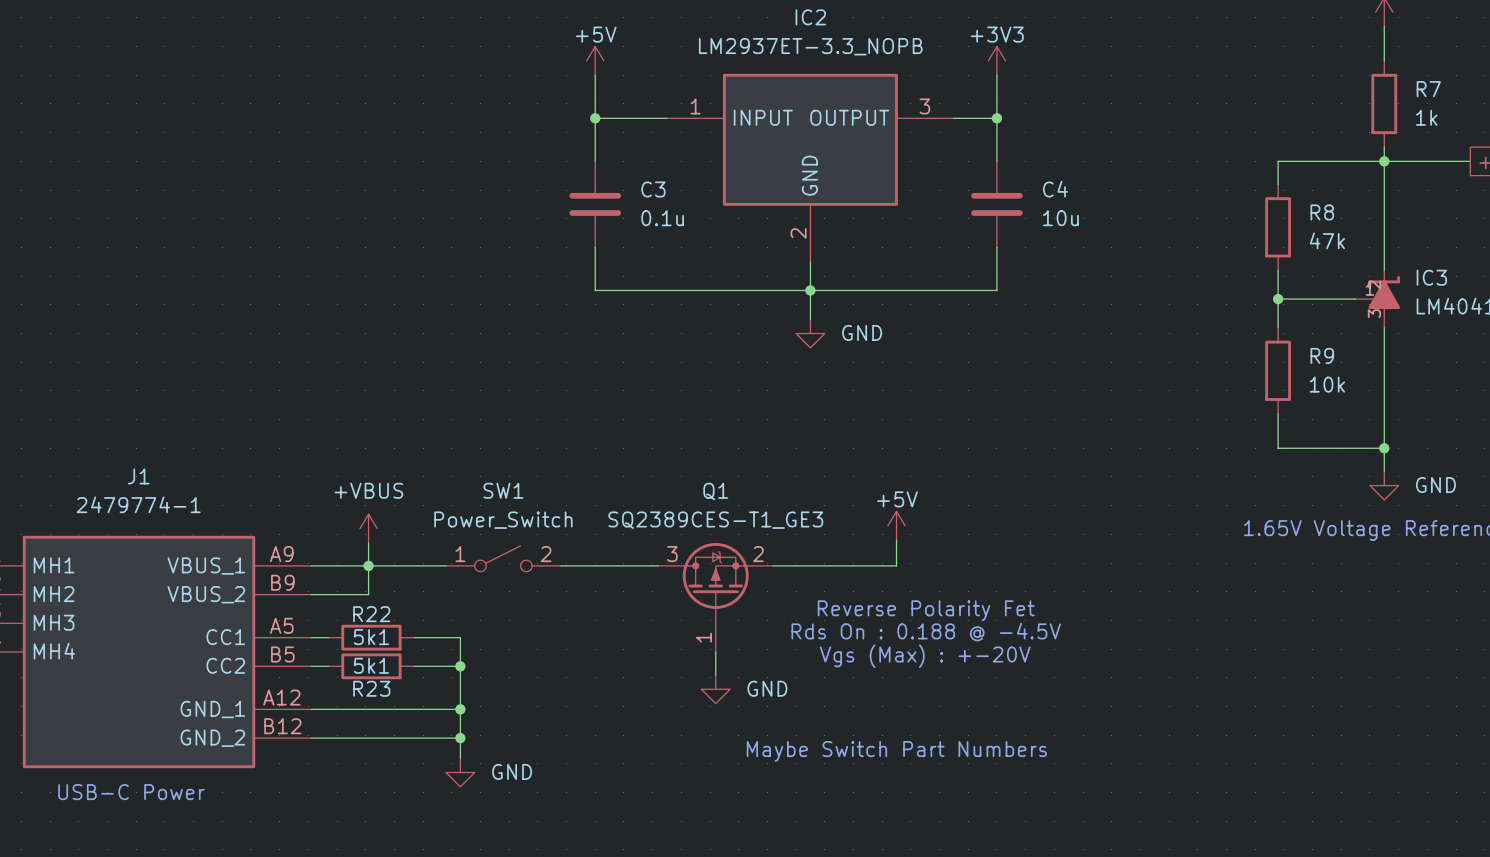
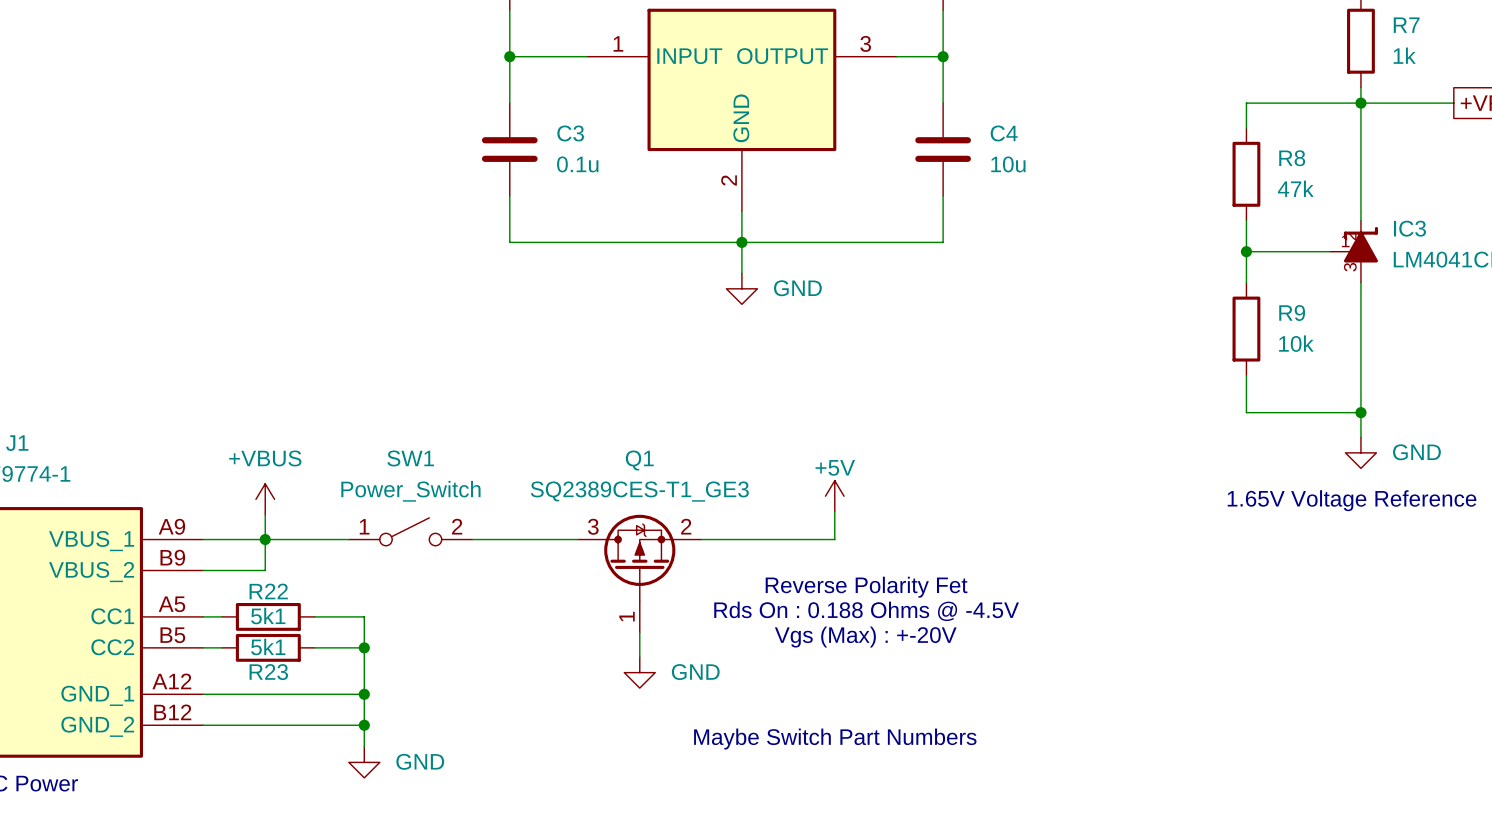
text: Rds On : 0.188 @ -4.5V (926, 632) -> Rds On : 0.188 Ohms @ -4.5V (866, 611)

